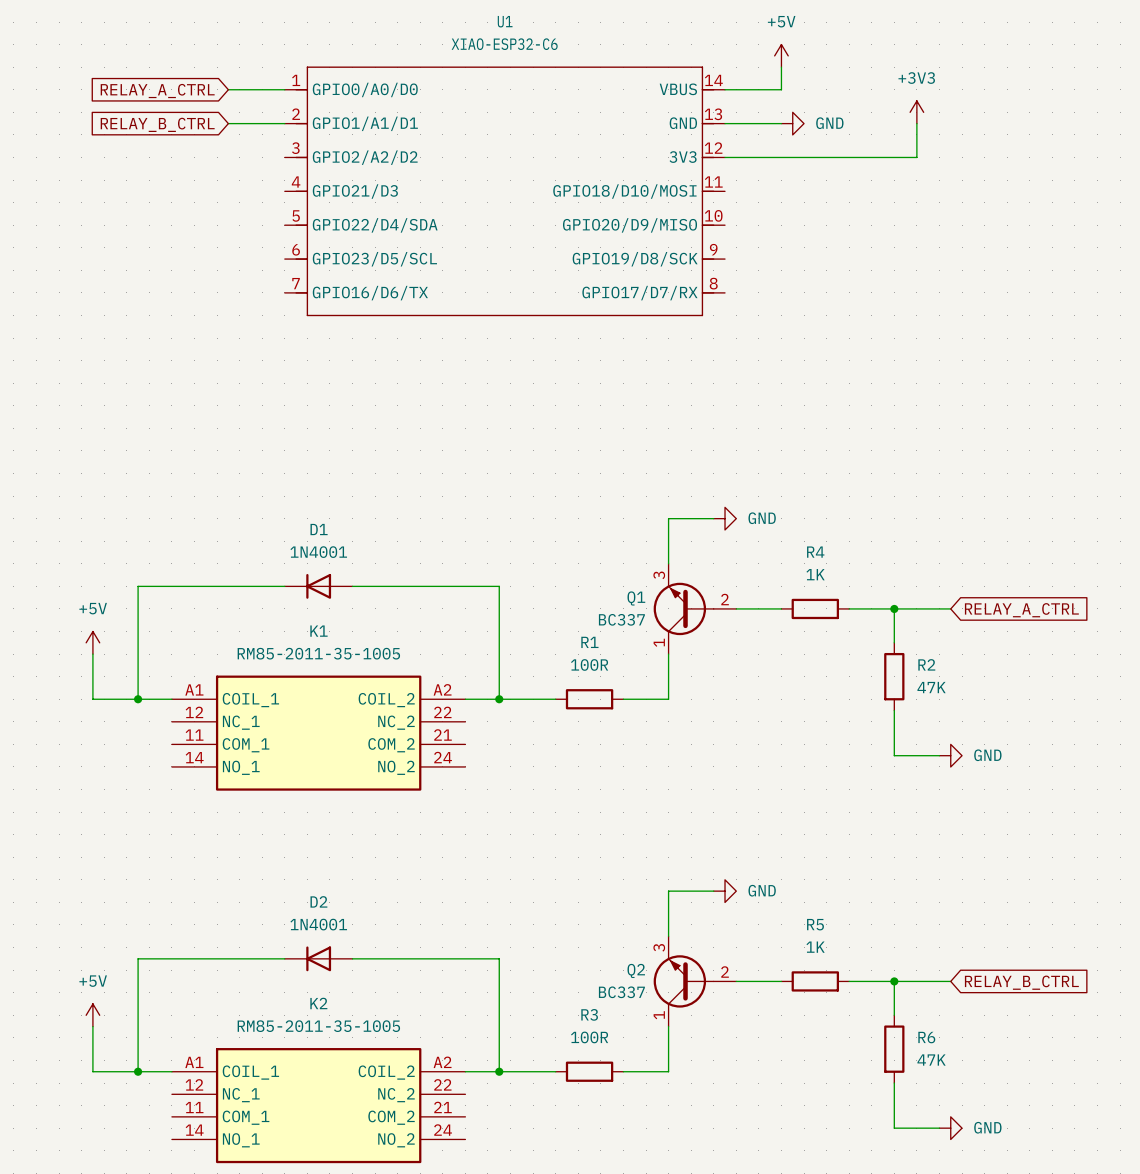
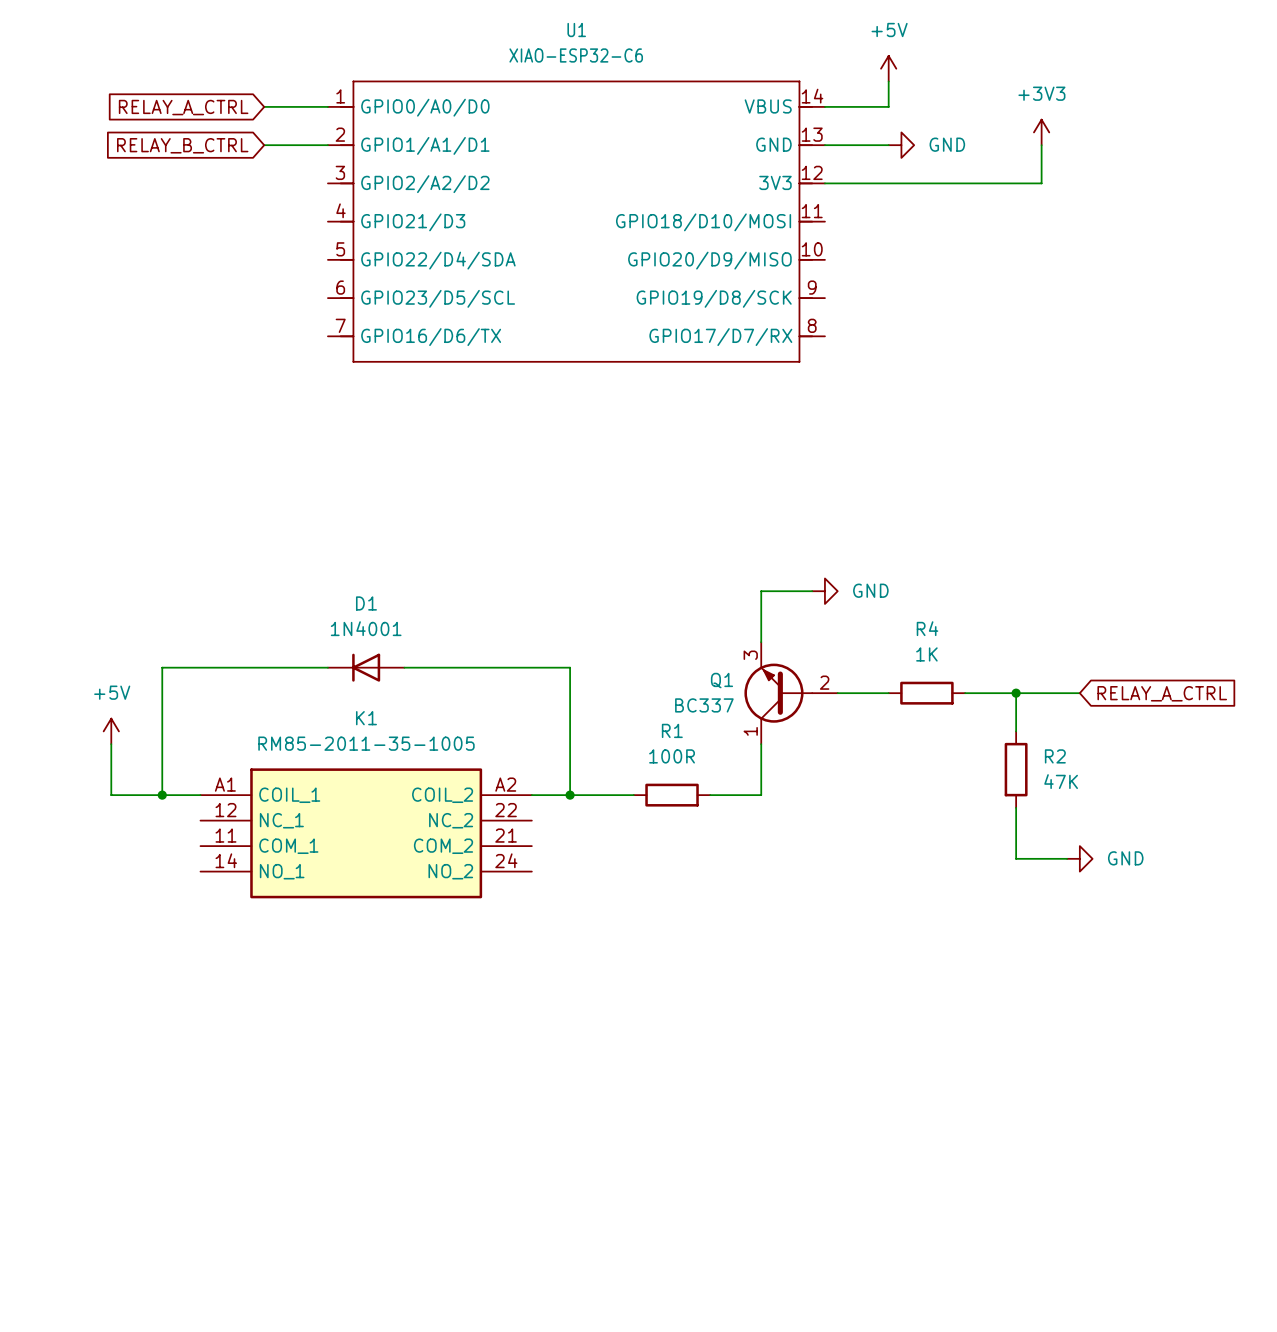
wire: (713, 891) (668, 891) (668, 936) -> none
power symbol: GND (725, 891) -> none
wire: (284, 958) (138, 958) (138, 1071) -> none
D2: 1N4001 (318, 958) -> none
wire: (352, 958) (499, 958) (499, 1071) -> none
Q2: BC337 (694, 981) -> none
wire: (736, 981) (781, 981) -> none
R5: 1K (815, 981) -> none
wire: (849, 981) (950, 981) -> none
wire: (894, 981) (894, 1015) -> none
junction: (894, 981) -> none
global label: RELAY_B_CTRL (1021, 982) -> none
power symbol: +5V (92, 1015) -> none
wire: (92, 1026) (92, 1071) (171, 1071) -> none
wire: (668, 1026) (668, 1071) (623, 1071) -> none
R6: 47K (894, 1049) -> none
junction: (138, 1071) -> none
wire: (465, 1071) (555, 1071) -> none
junction: (499, 1071) -> none
R3: 100R (589, 1071) -> none
wire: (894, 1083) (894, 1128) (939, 1128) -> none
K2: RM85-2011-35-1005 (318, 1105) -> none
power symbol: GND (950, 1128) -> none

